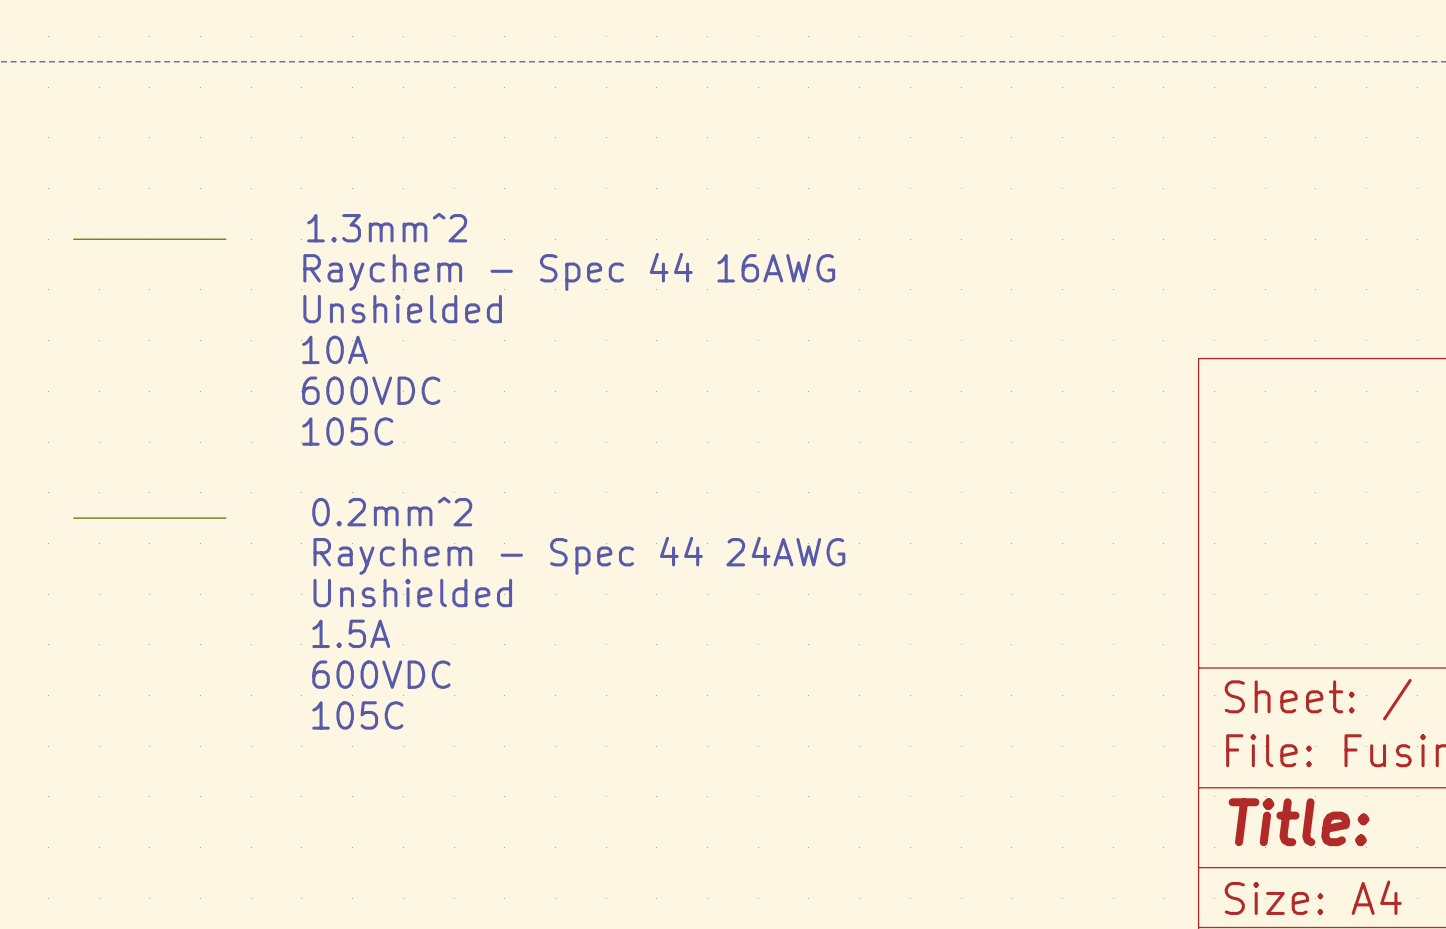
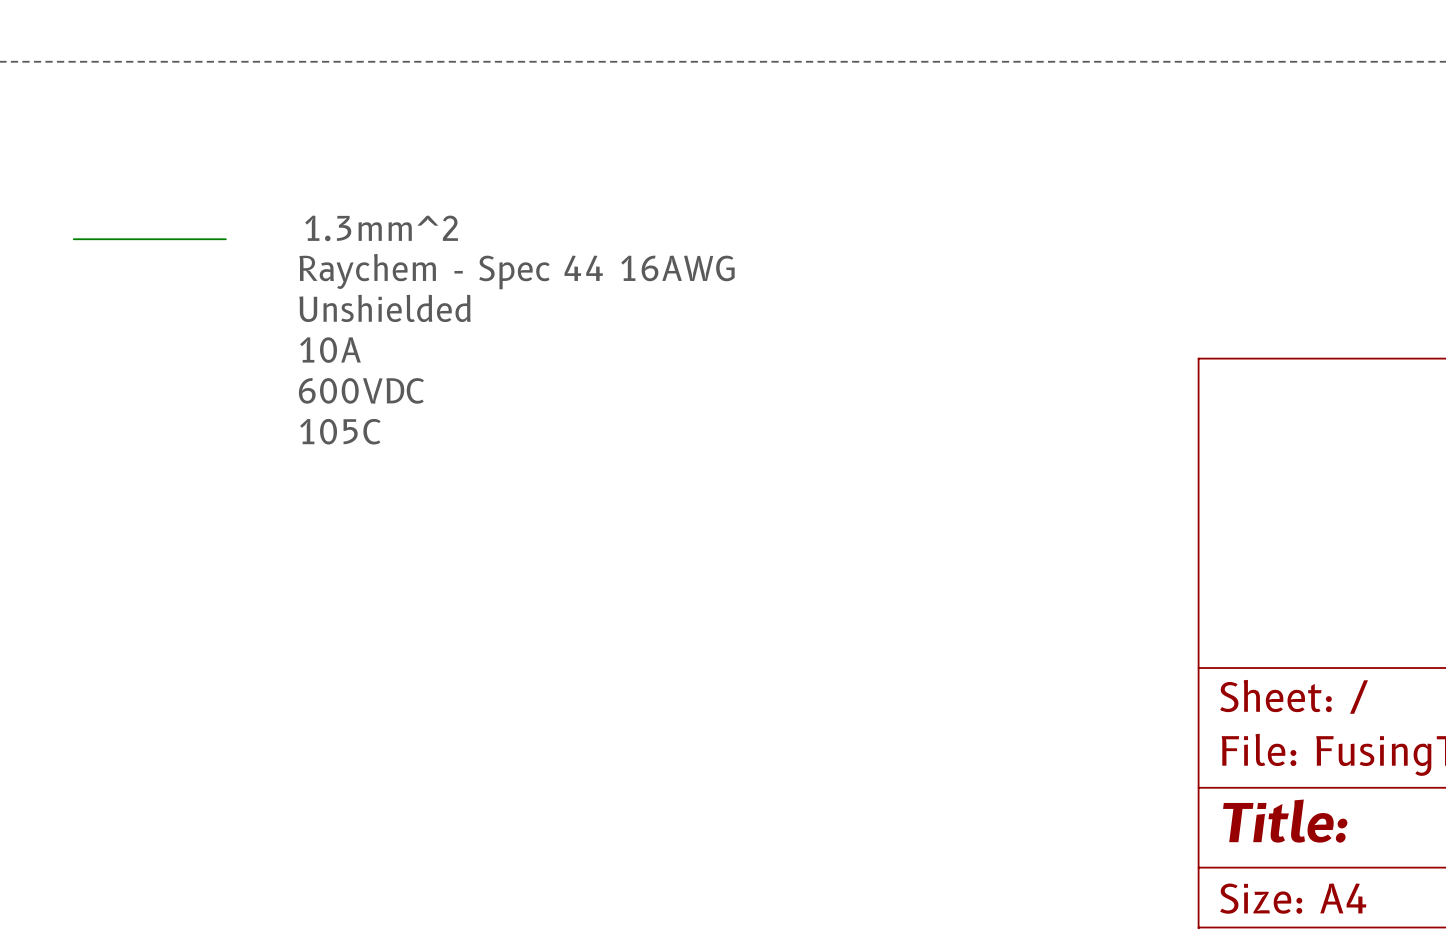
text: 0.2mm^2 (392, 511) -> none
wire: (73, 518) (225, 518) -> none
text: Raychem - Spec 44 24AWG (579, 555) -> none
text: Unshielded (412, 593) -> none
text: 1.5A (351, 633) -> none
text: 600VDC (381, 674) -> none
text: 105C (357, 715) -> none

